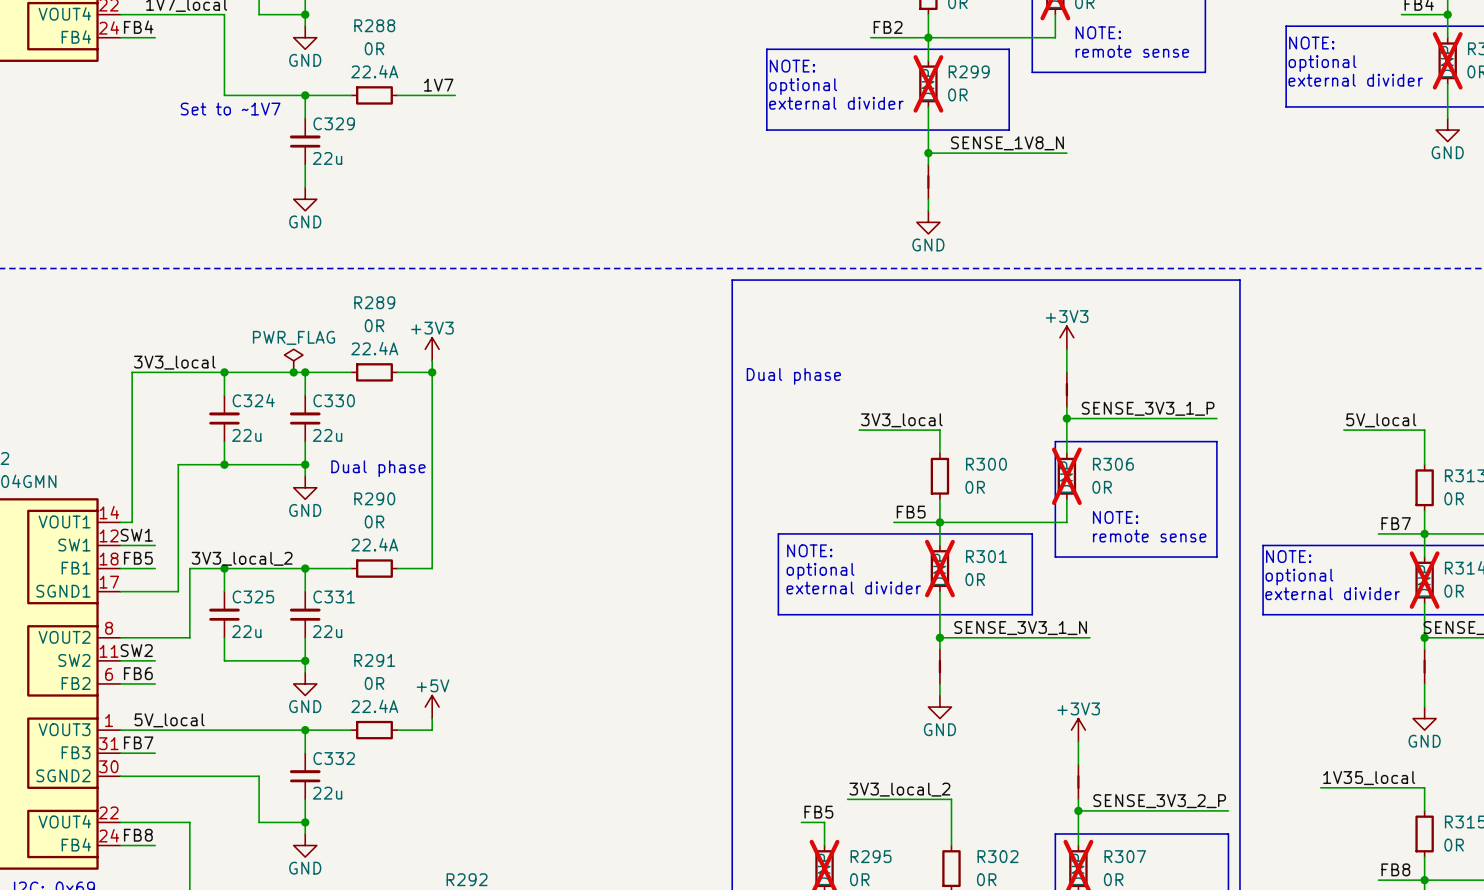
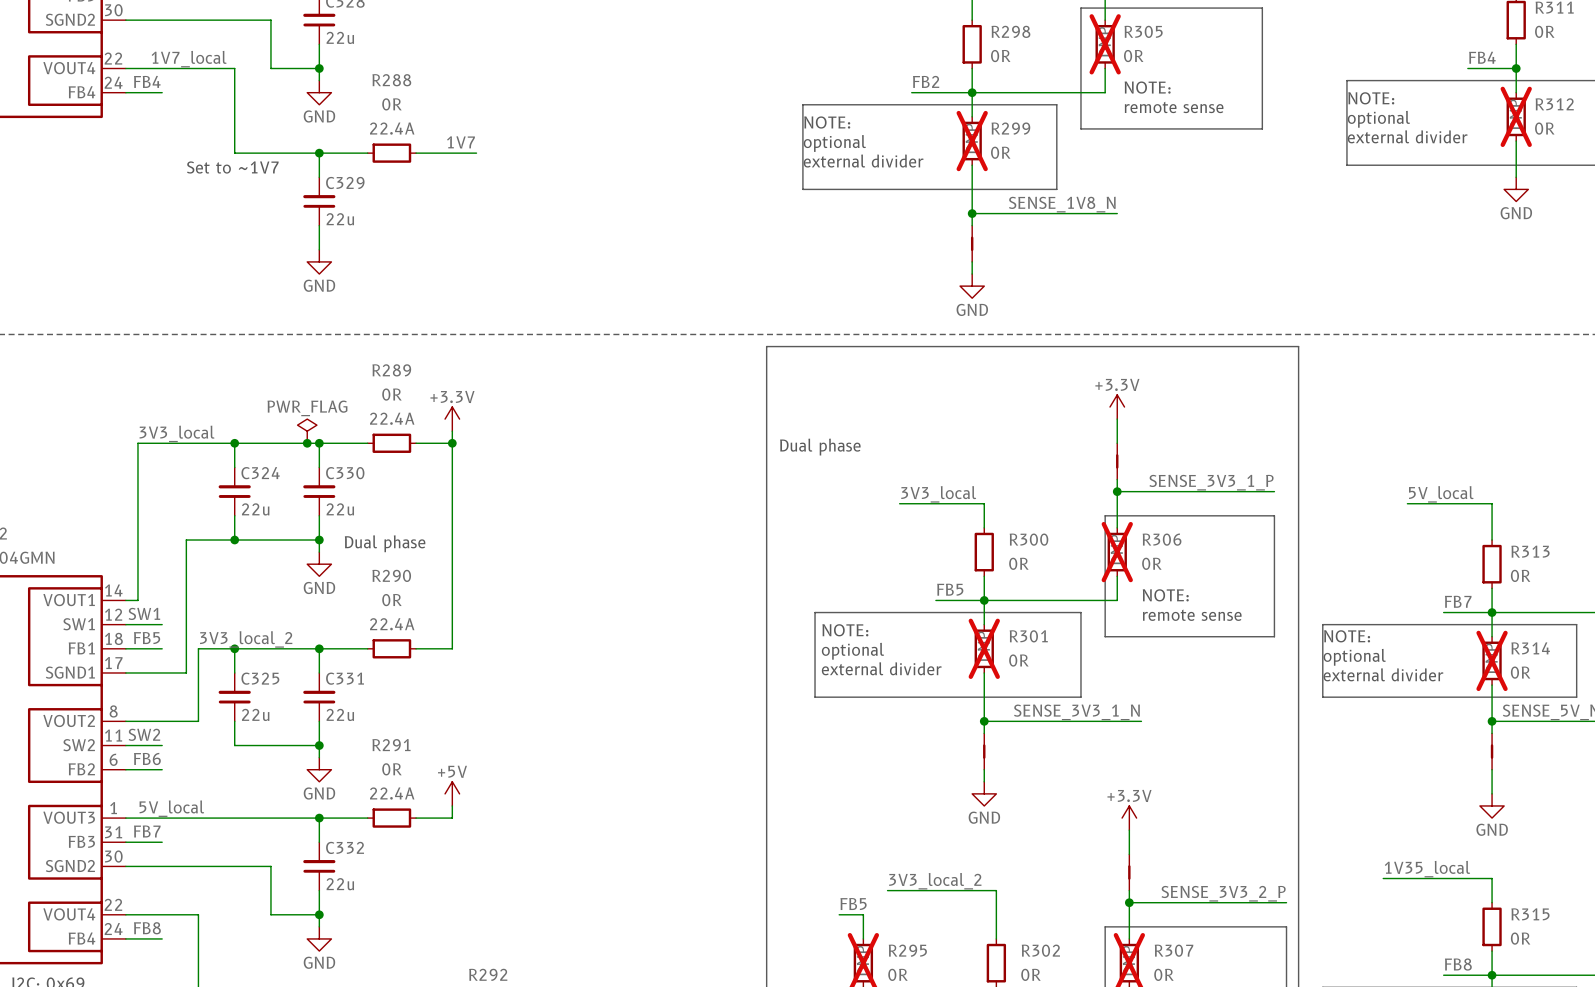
power symbol: +3V3 (1066, 337) -> +3.3V (1117, 407)
power symbol: +3V3 (432, 349) -> +3.3V (452, 419)
power symbol: +3V3 (1078, 730) -> +3.3V (1129, 818)

